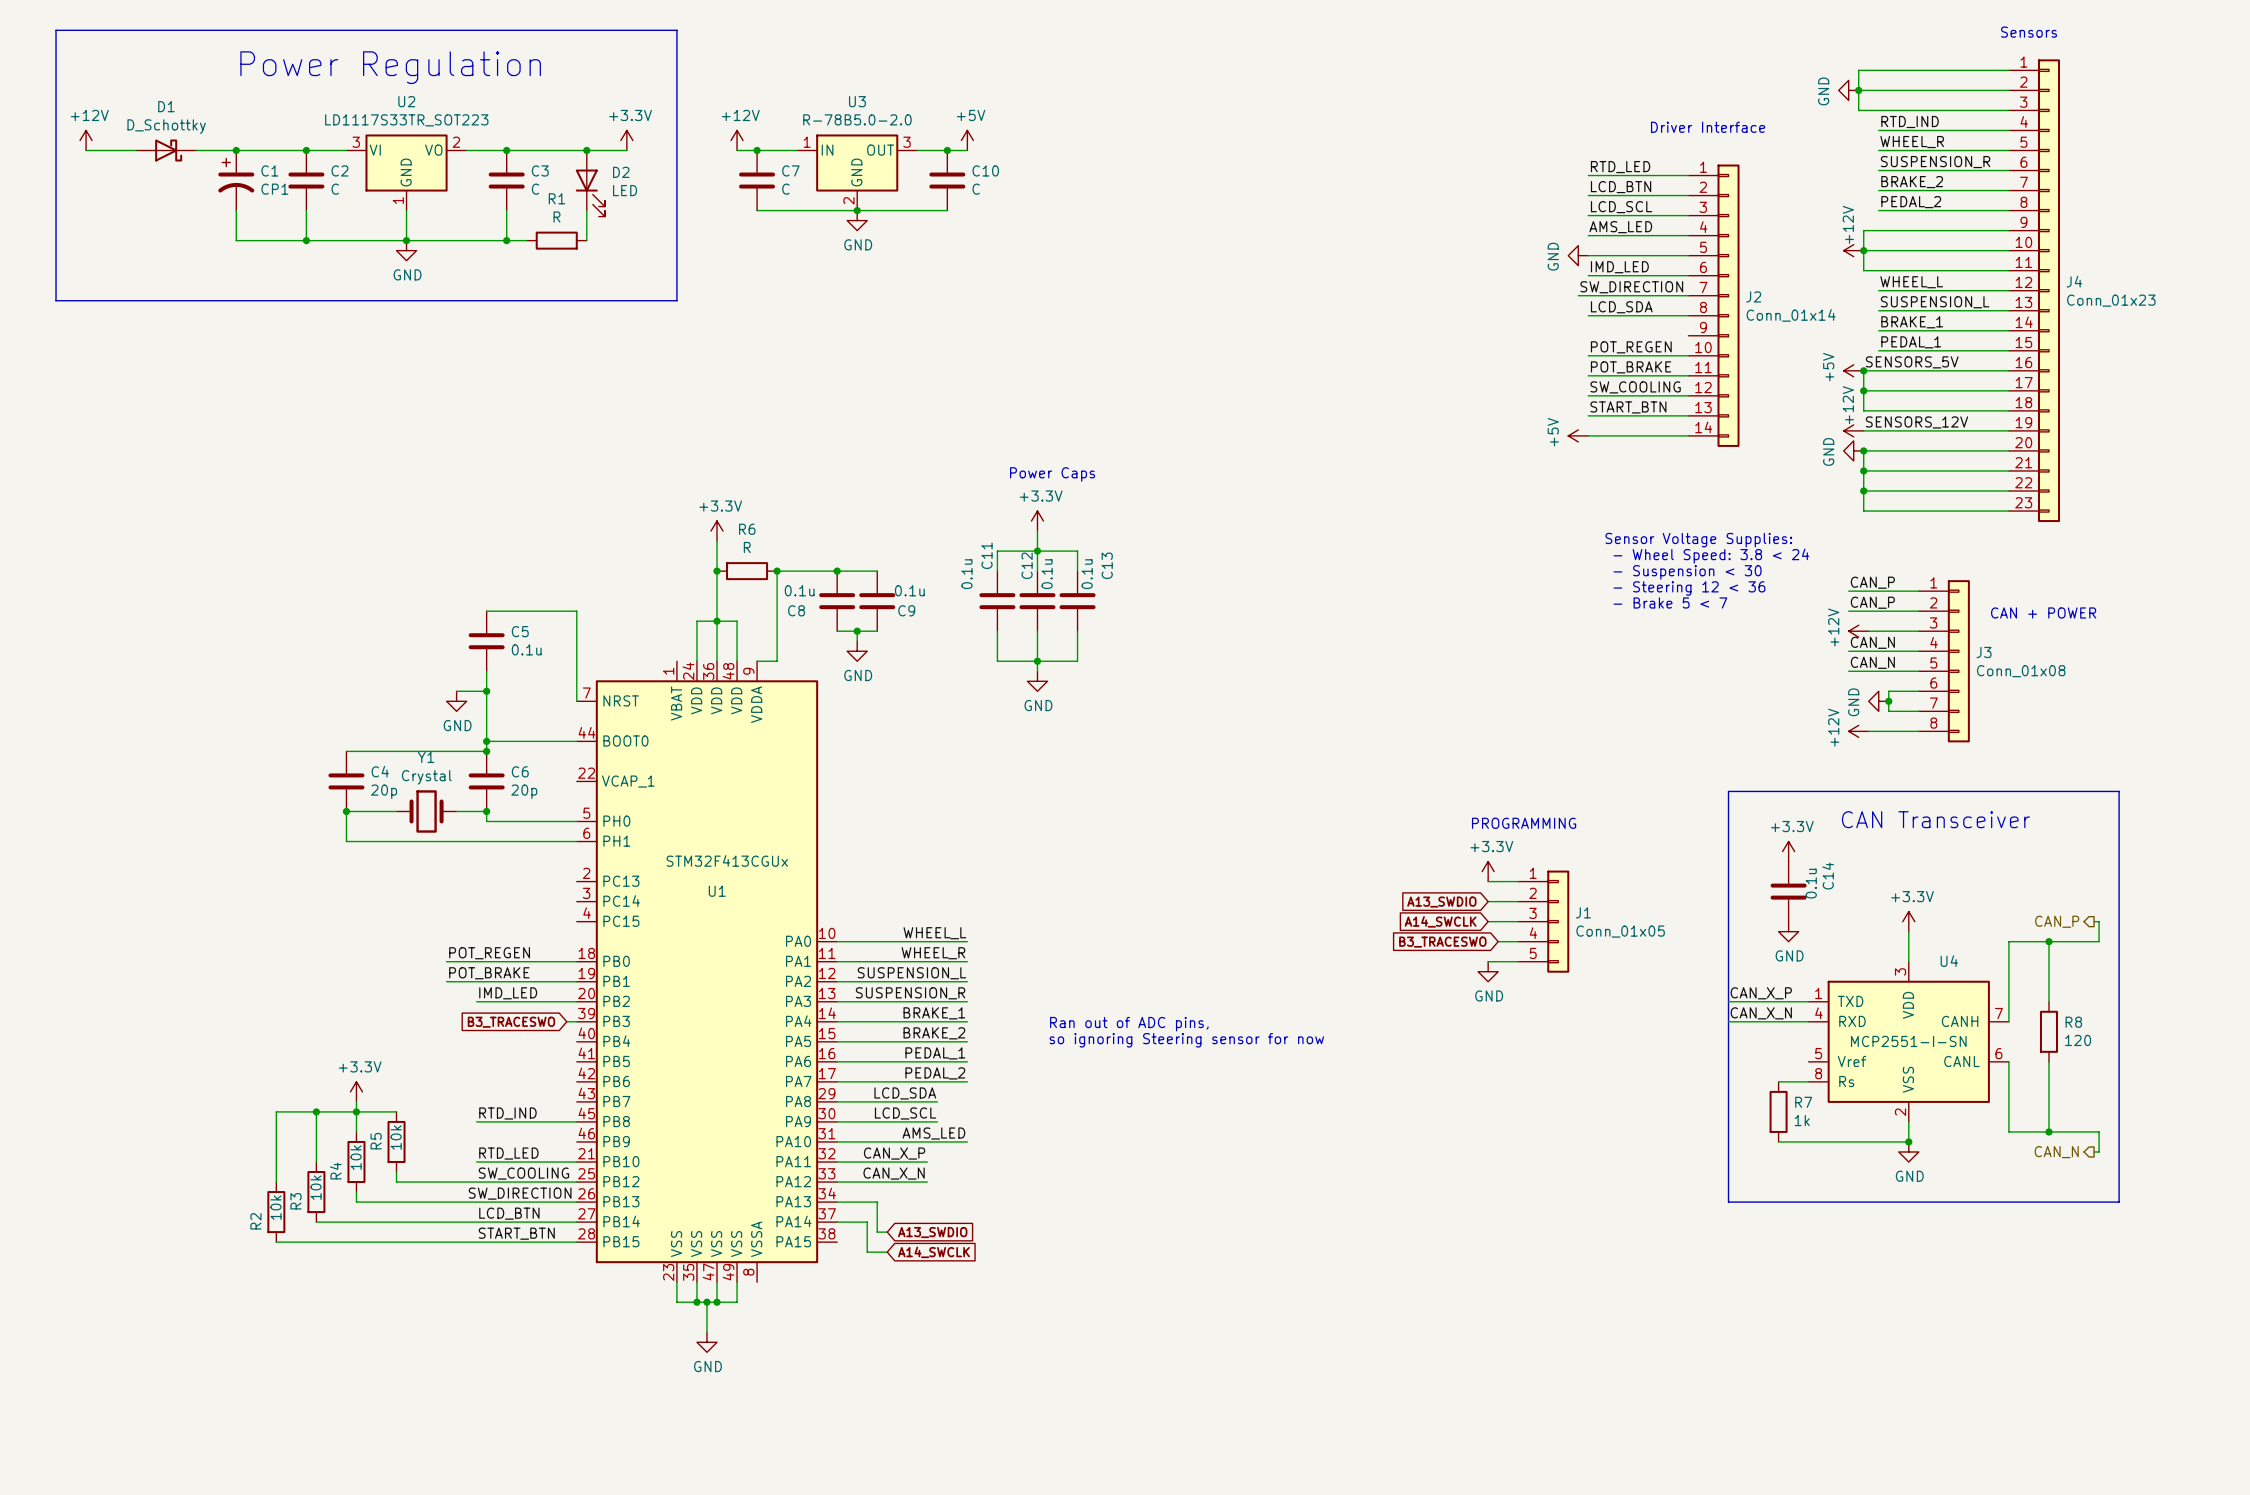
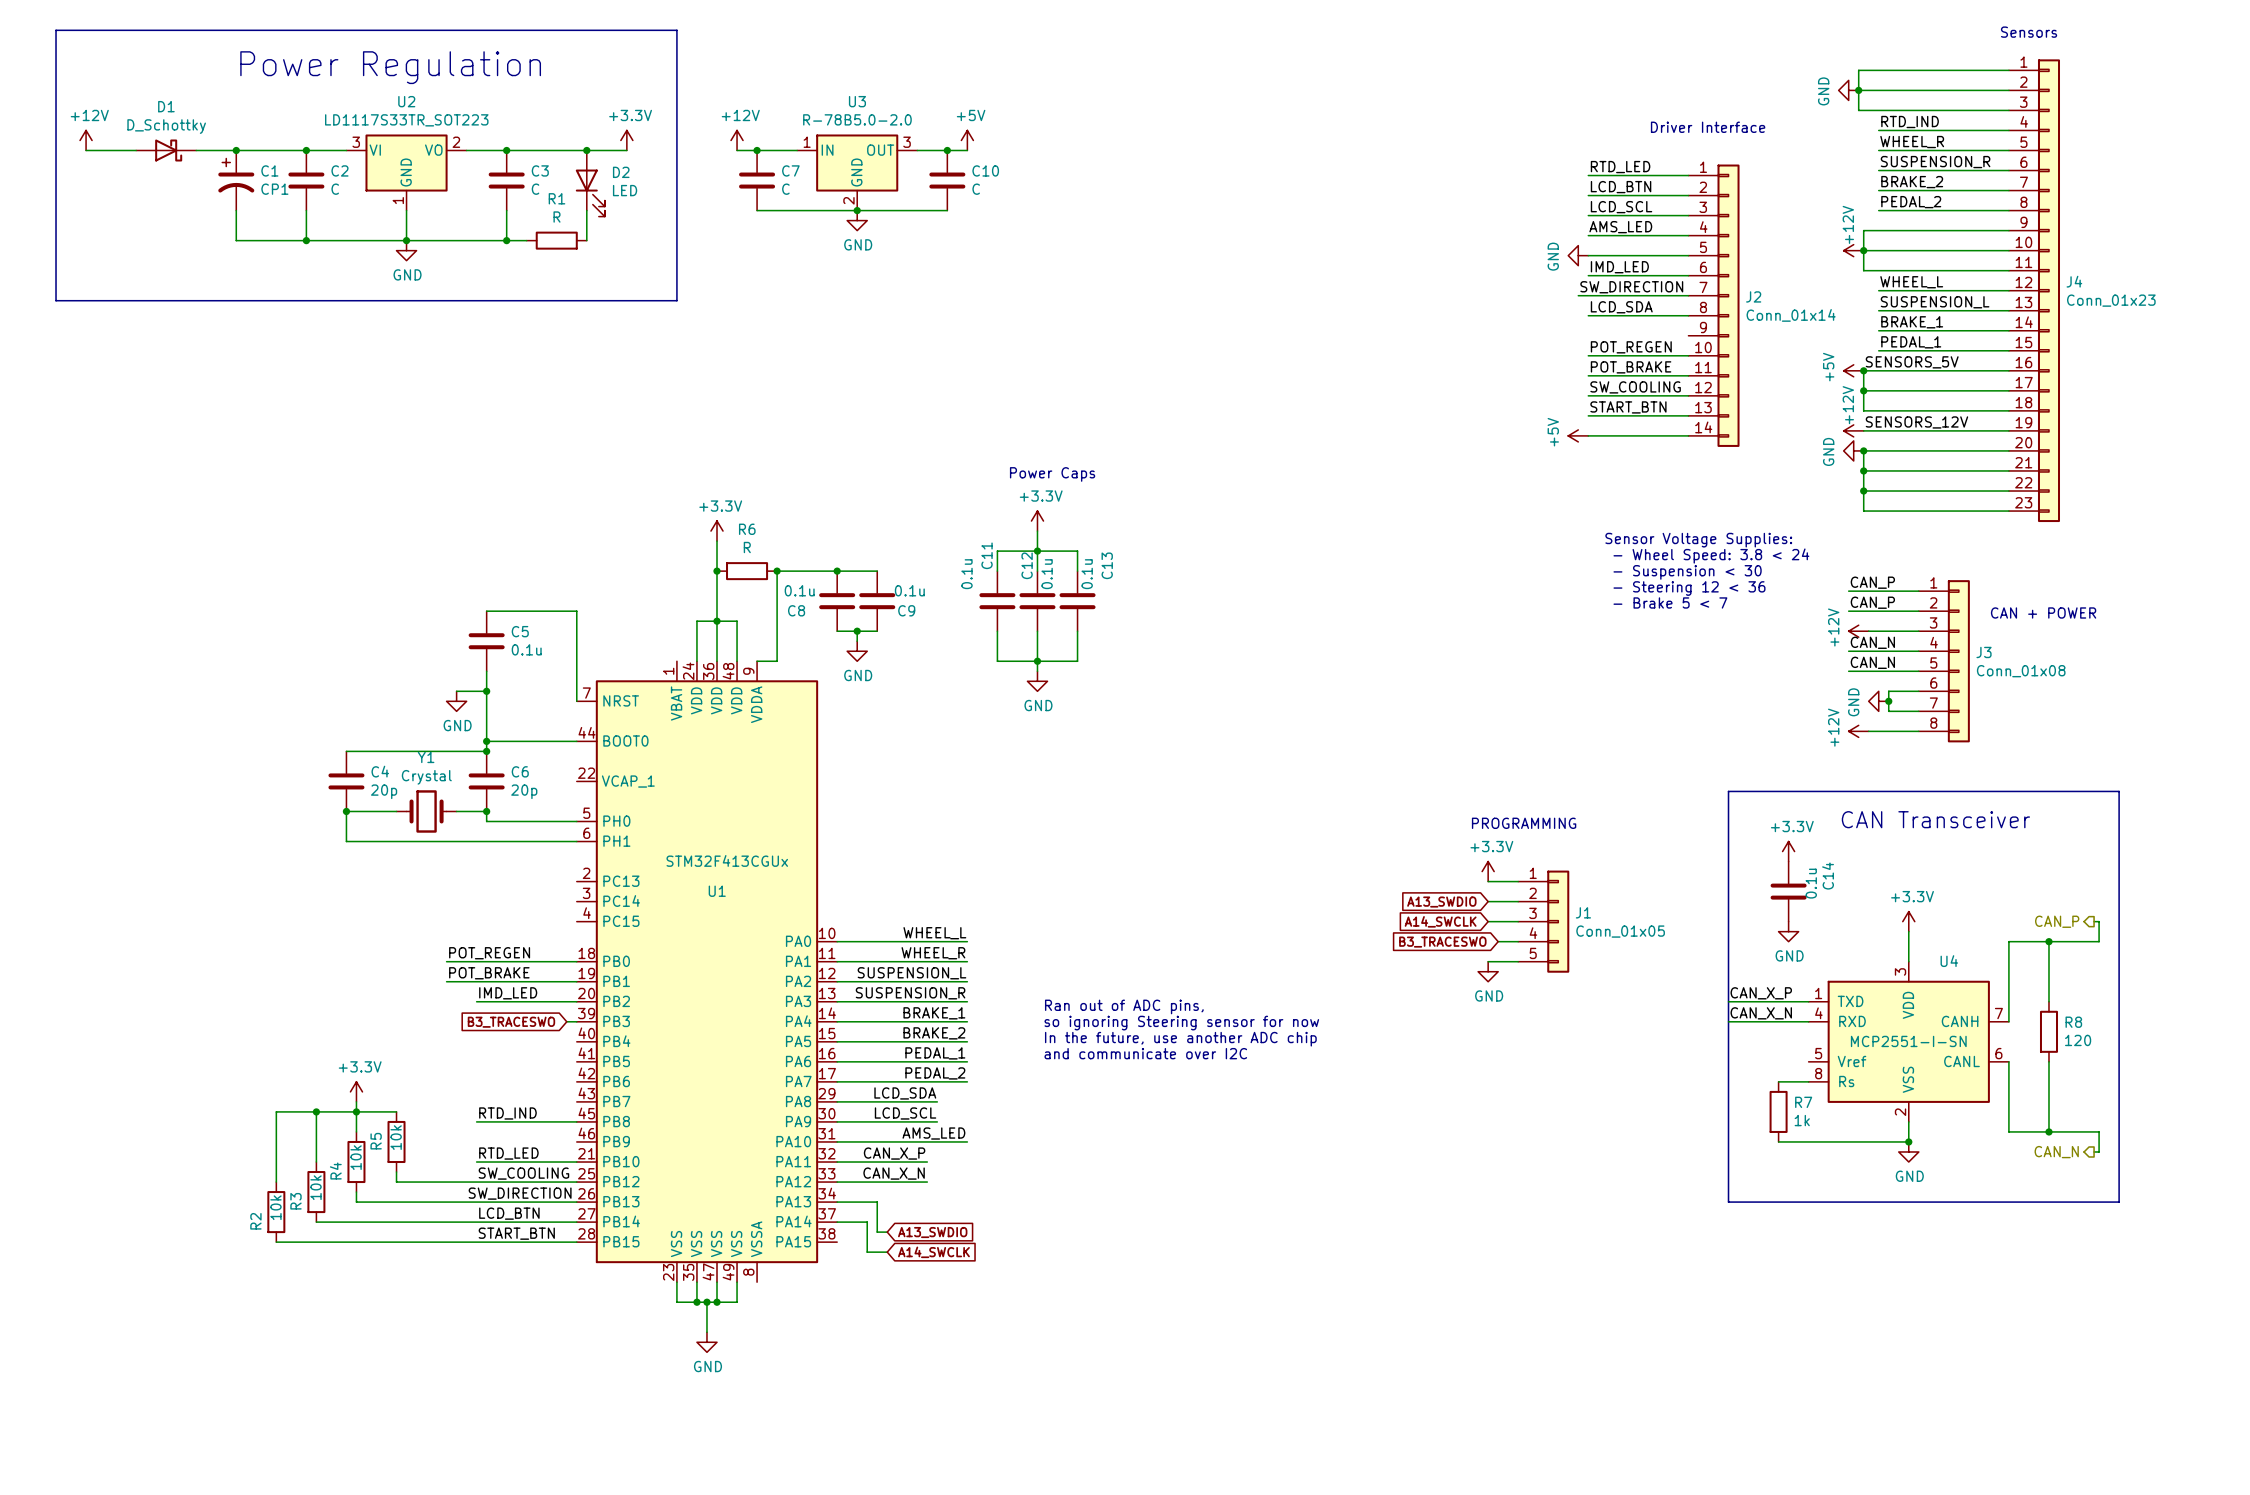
text: none -> Ran out of ADC pins, (1124, 1006)
text: Ran out of ADC pins, (1129, 1024) -> so ignoring Steering sensor for now (1181, 1023)
text: so ignoring Steering sensor for now (1186, 1040) -> In the future, use another ADC chip (1180, 1039)
text: none -> and communicate over I2C (1145, 1053)

